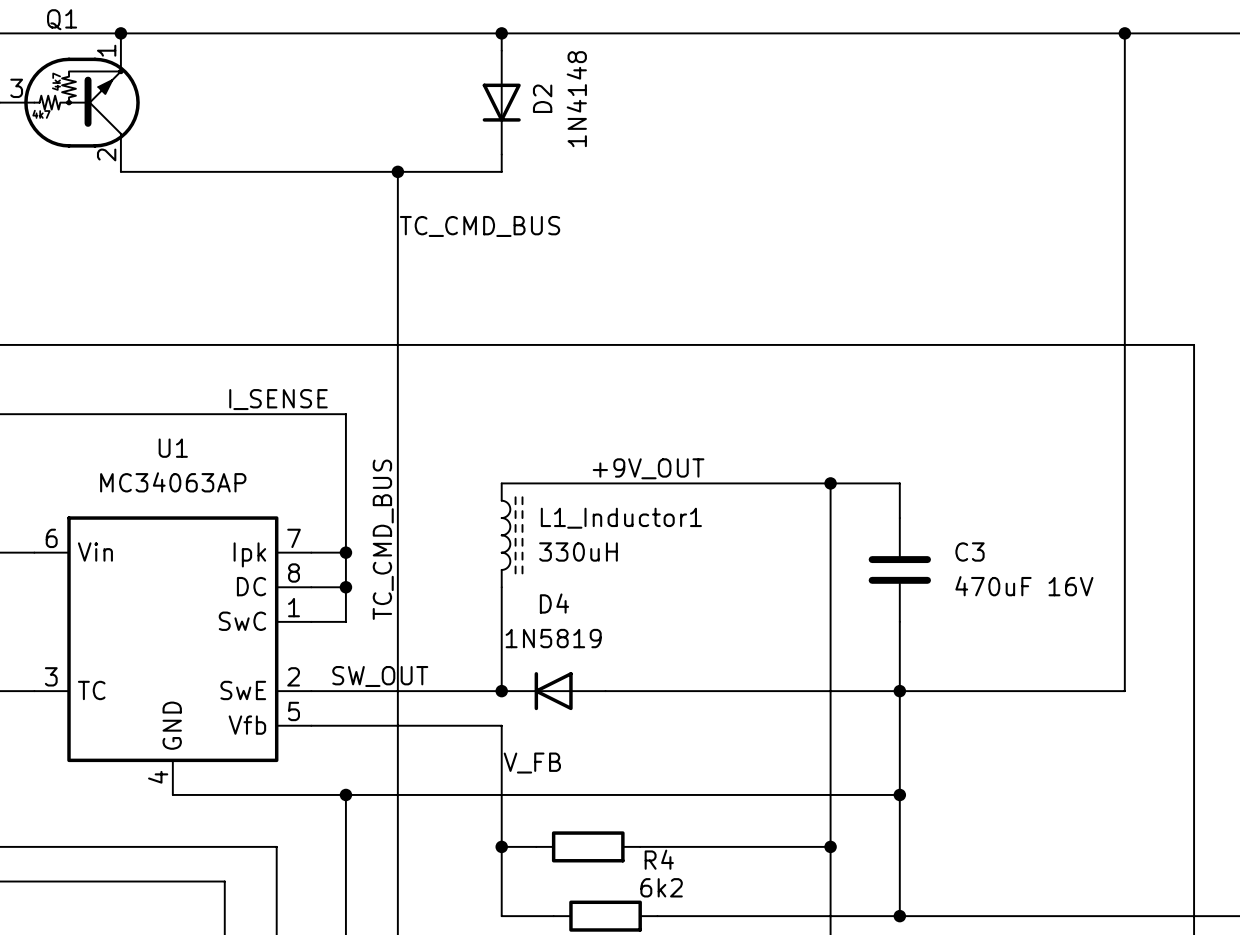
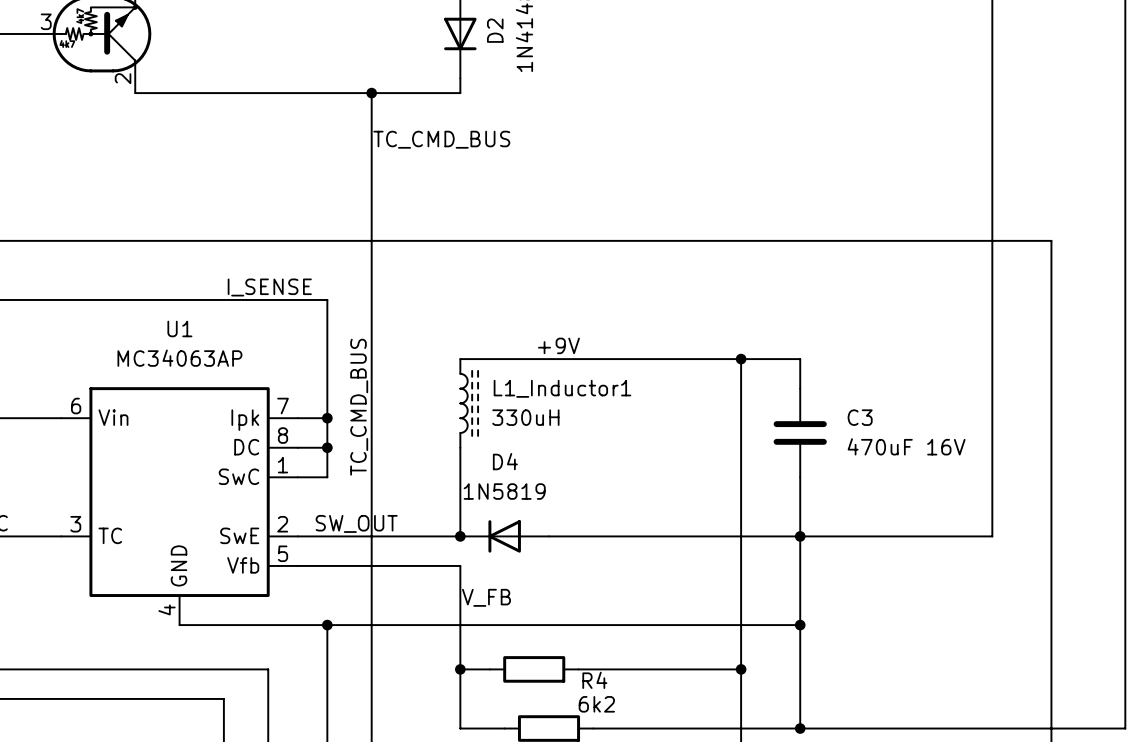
label: +9V_OUT (648, 468) -> +9V (558, 345)

